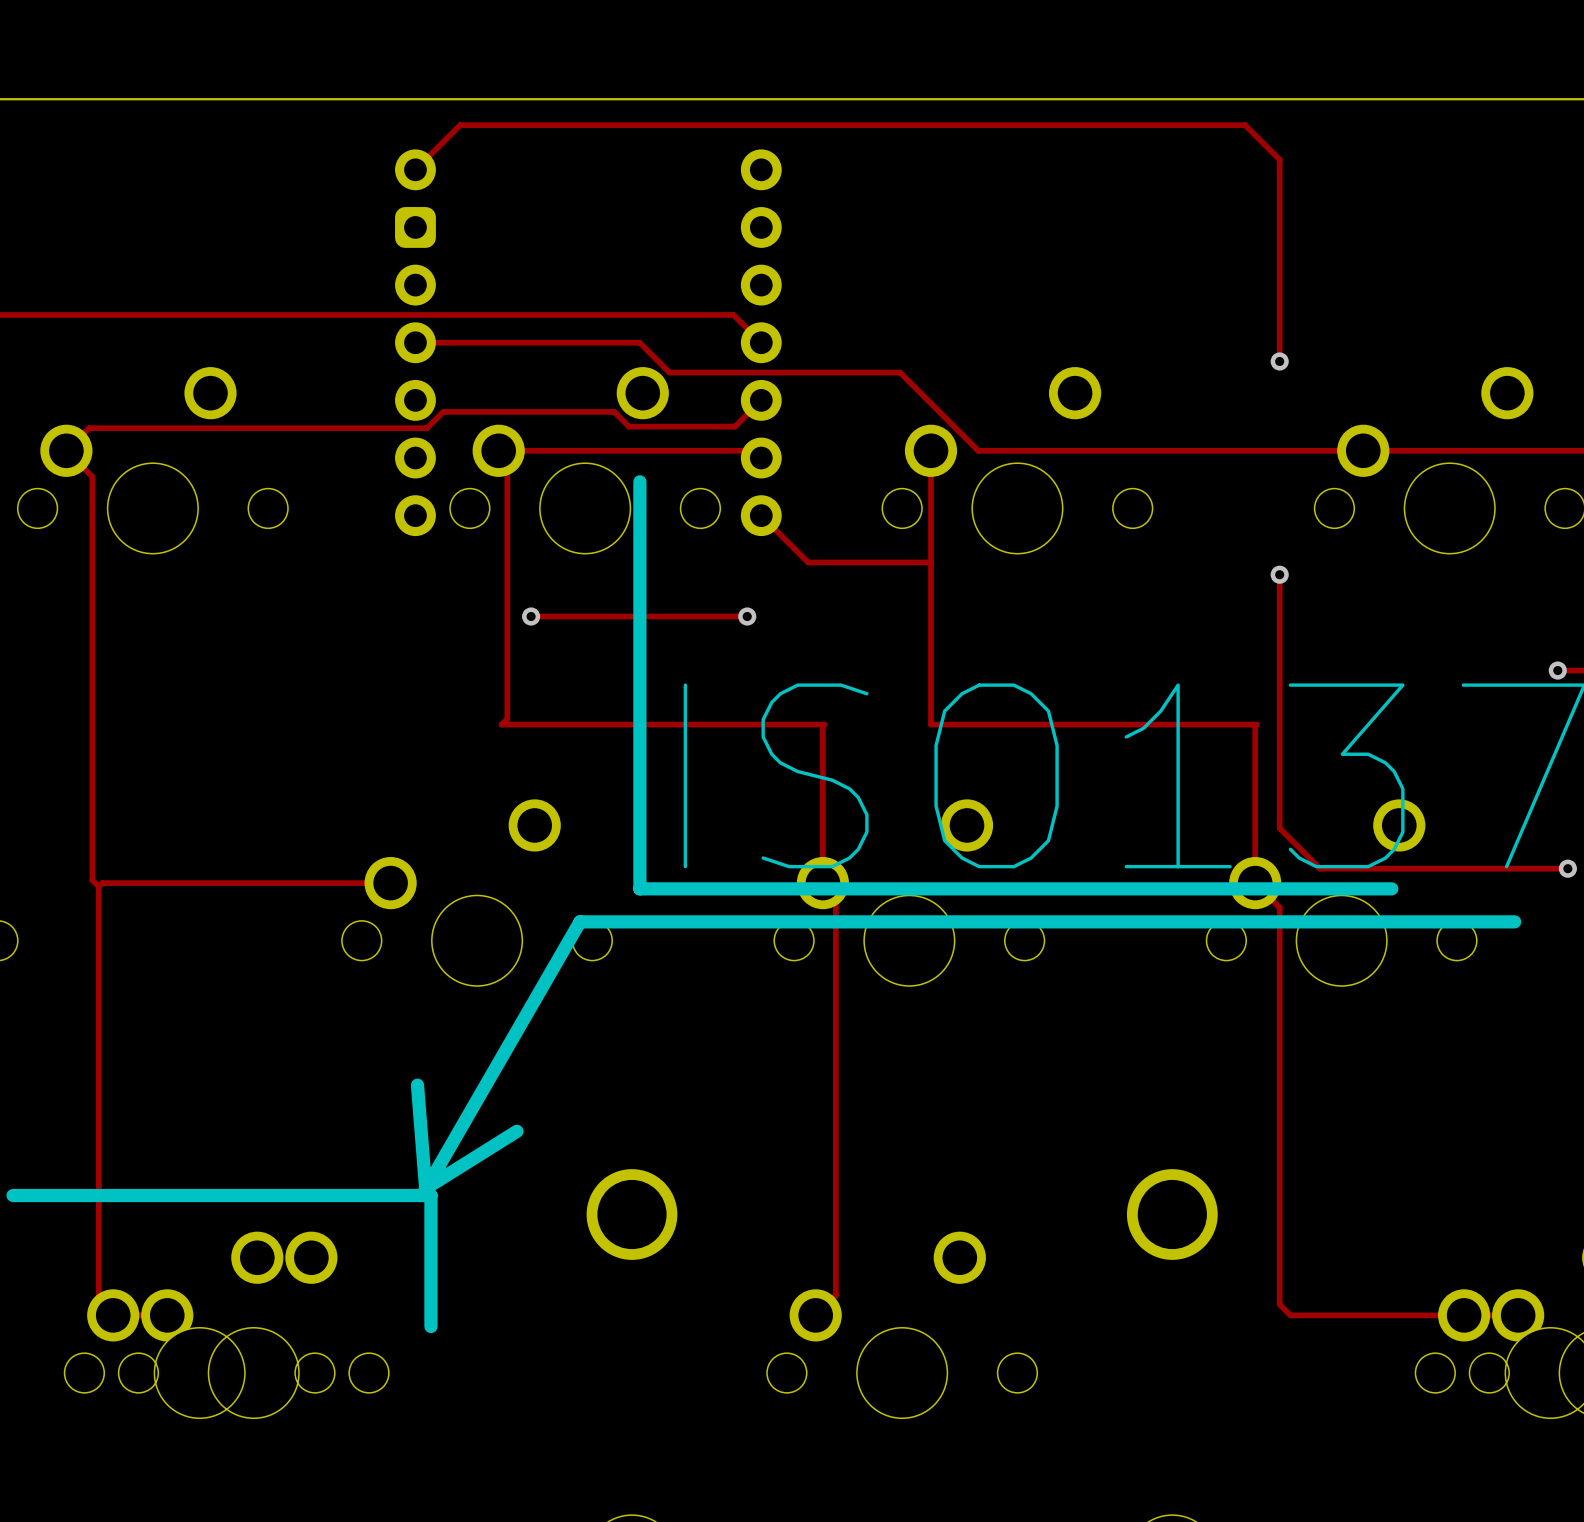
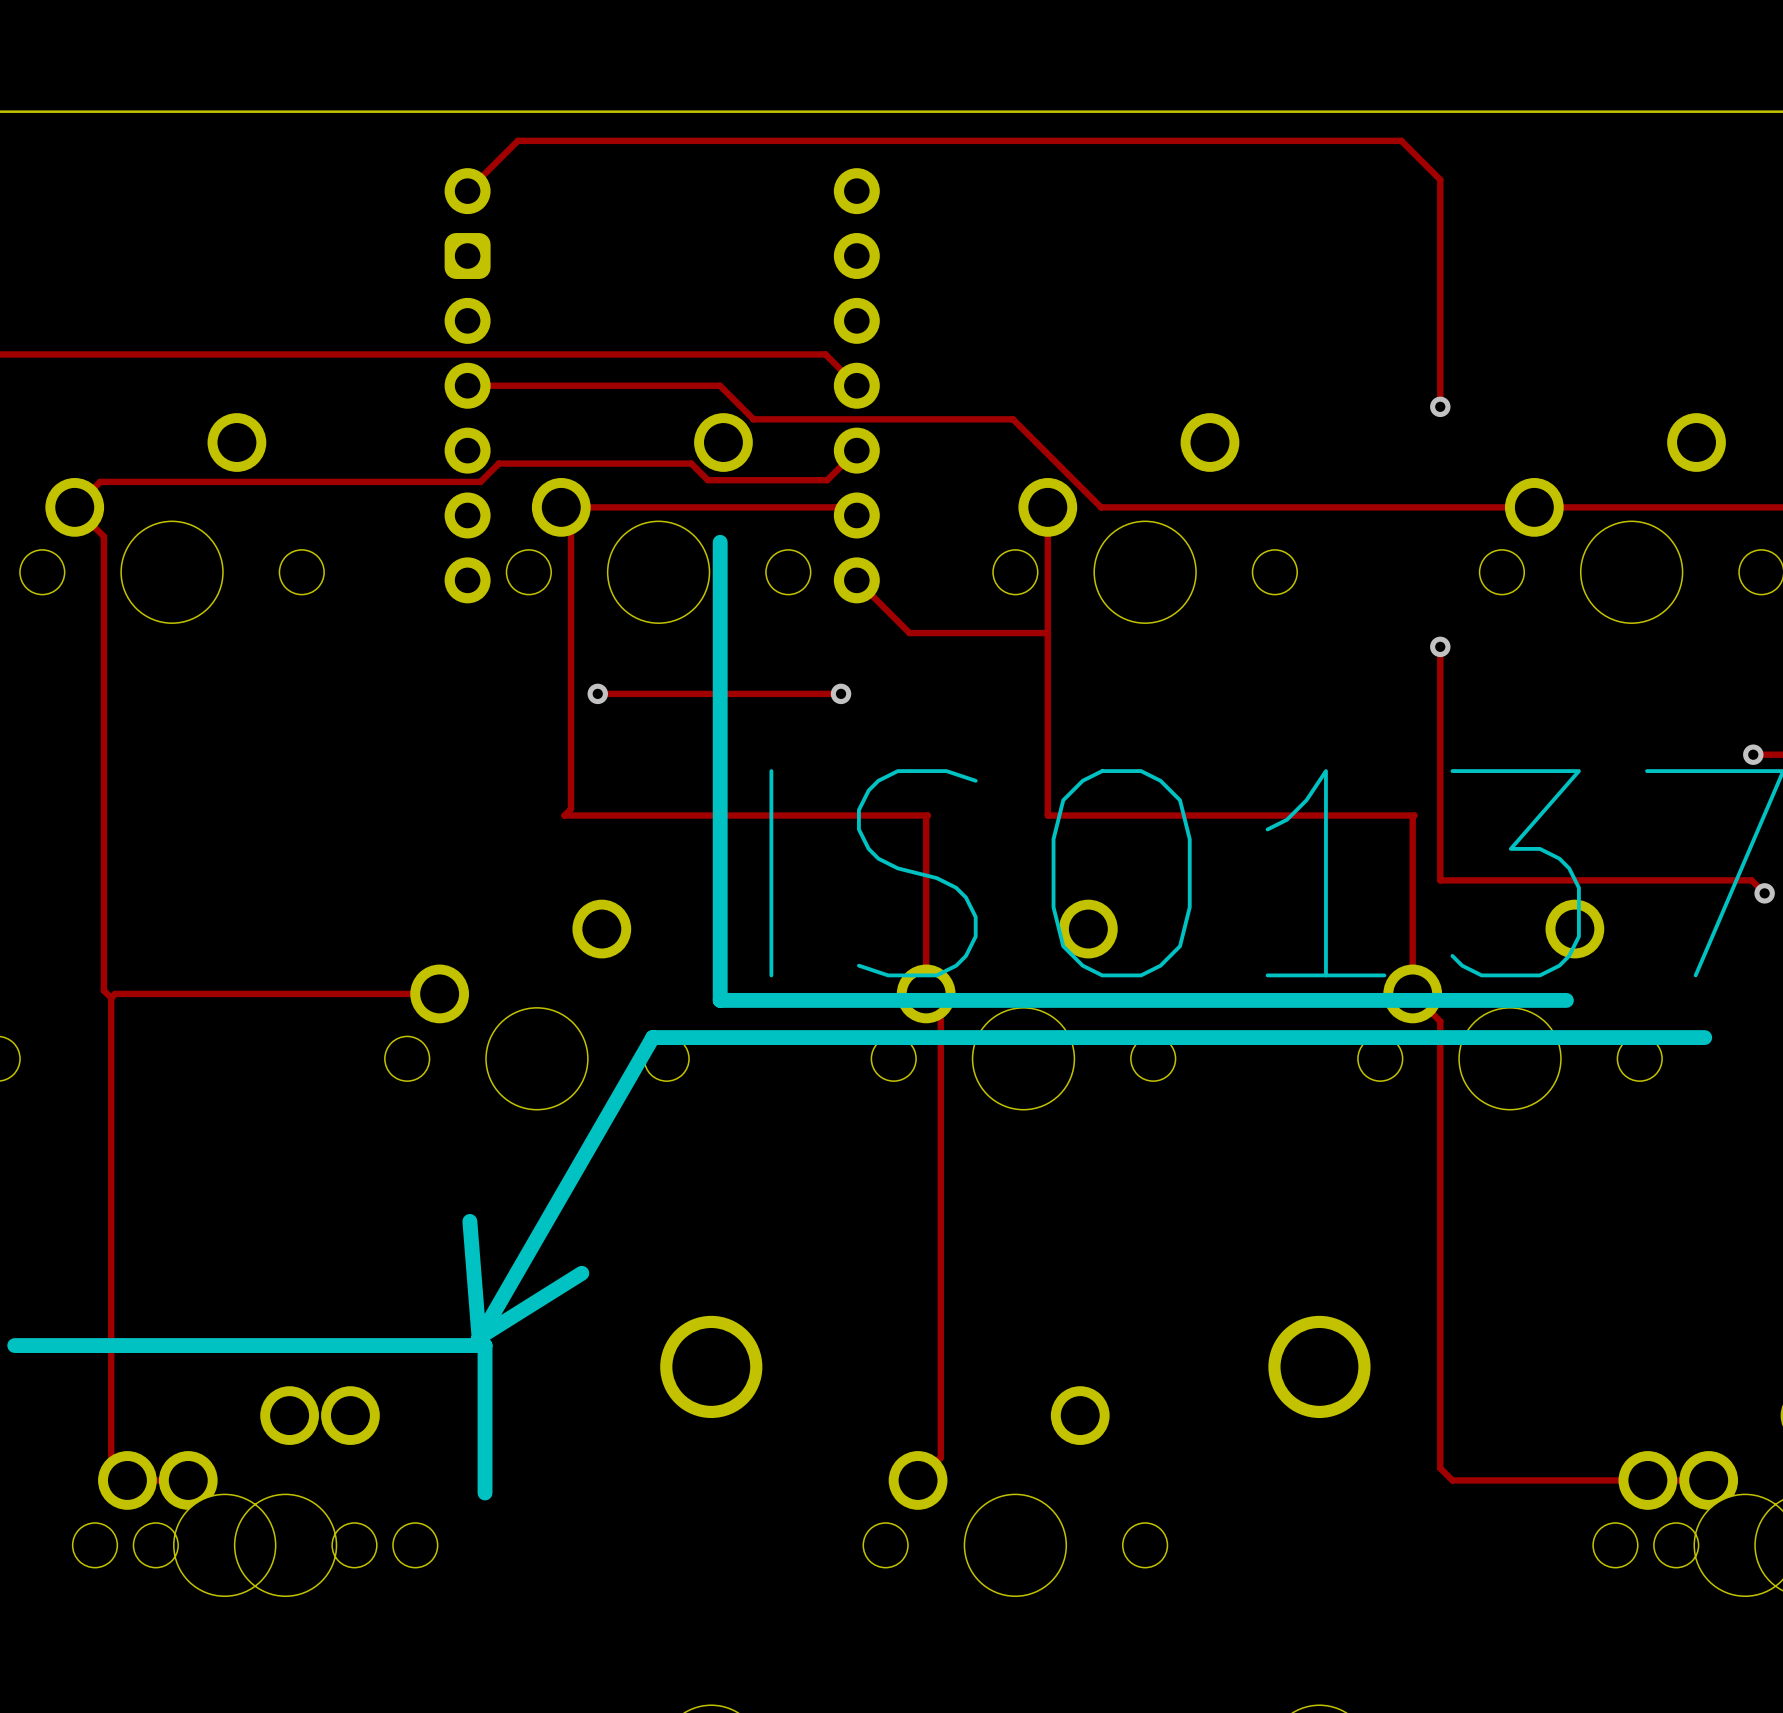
track: (1279, 782) (1279, 828) (1320, 868) (1567, 868) -> (1440, 880) (1751, 880) (1764, 893)
via position: (1567, 868) -> (1764, 893)

